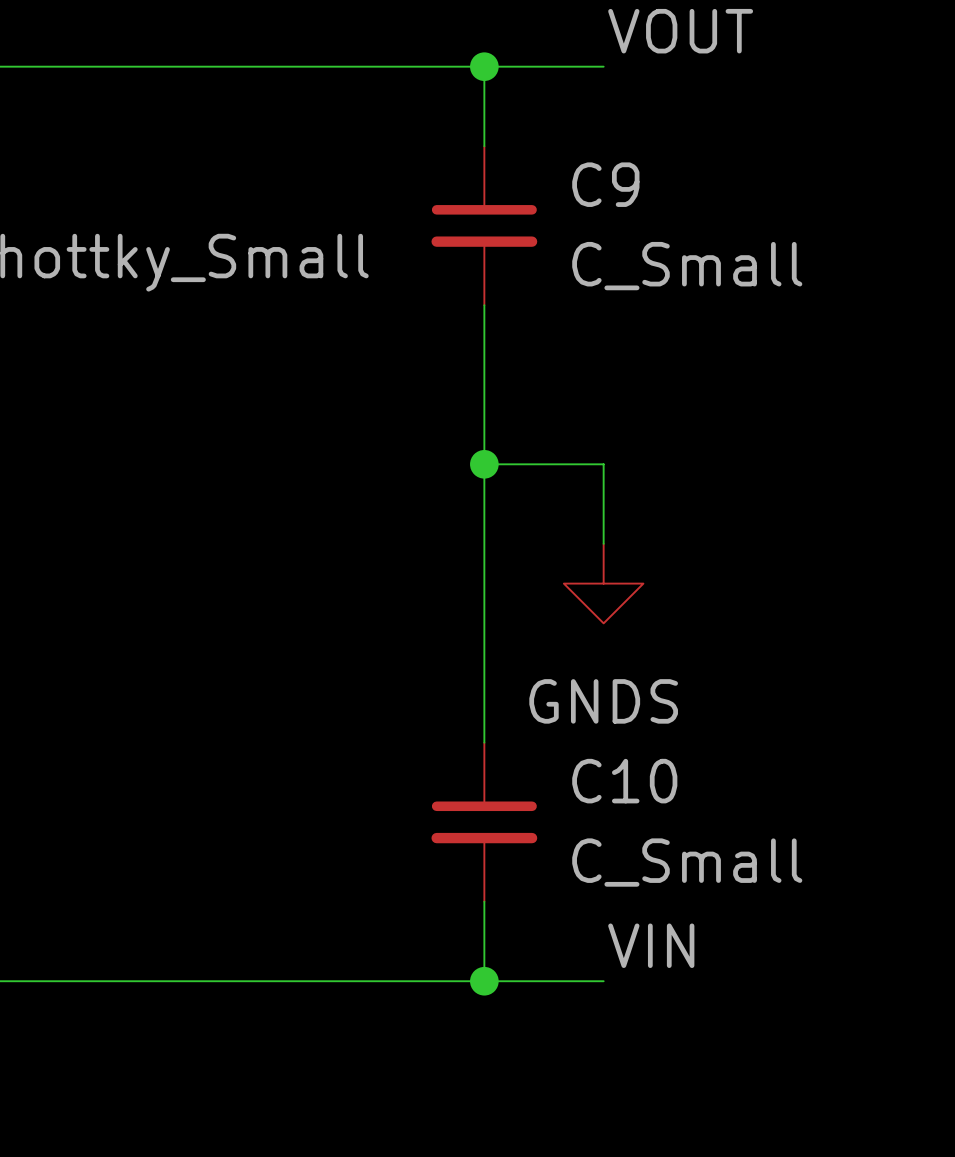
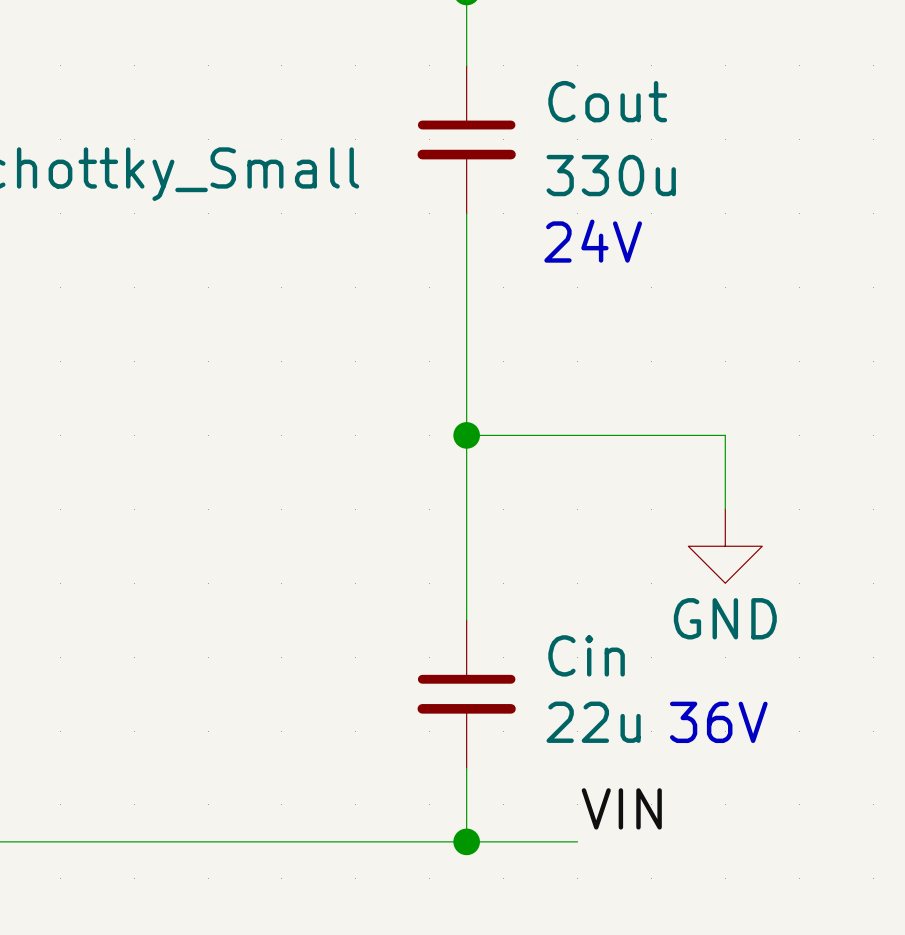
C9 name: C9 (605, 184) -> Cout (607, 101)
C9 value: C_Small (687, 266) -> 330u (611, 175)
text: none -> 24V (593, 241)
wire: (484, 464) (603, 464) (603, 543) -> none
junction position: (484, 464) -> (466, 435)
wire: none -> (466, 435) (725, 435) (725, 509)
power symbol: GNDS (603, 583) -> none
power symbol: none -> GND (725, 546)
C10 name: C10 (624, 781) -> Cin (586, 655)
text: none -> 36V (718, 722)
C10 value: C_Small (687, 862) -> 22u (593, 722)

